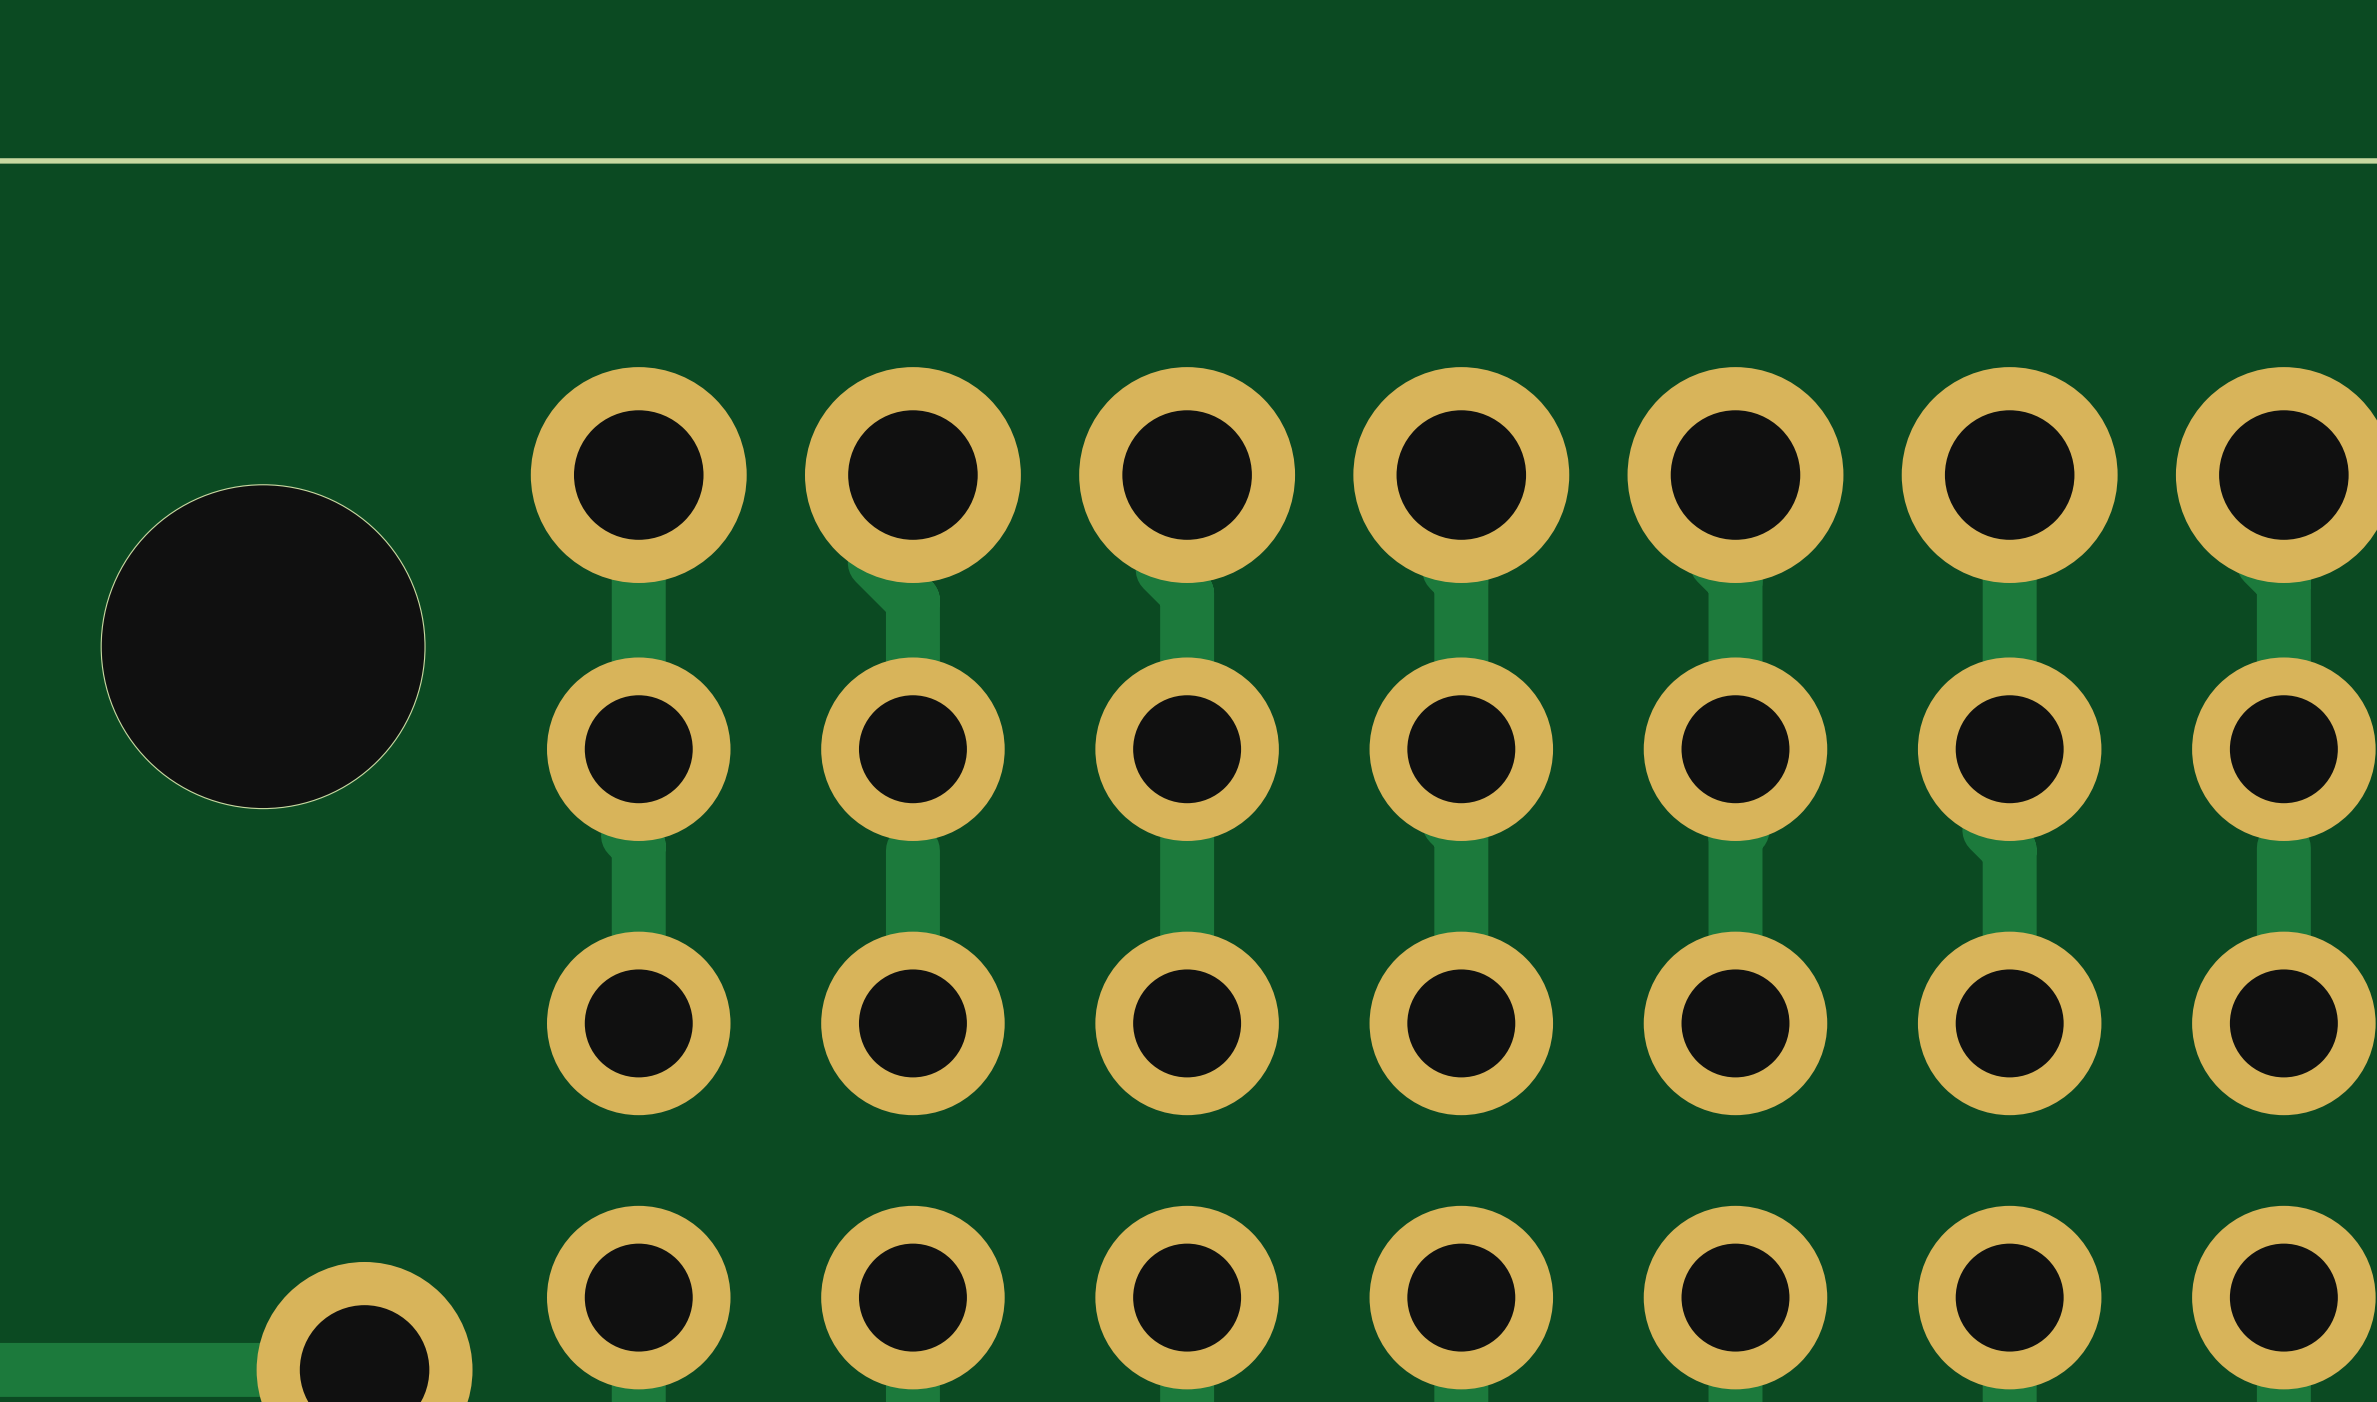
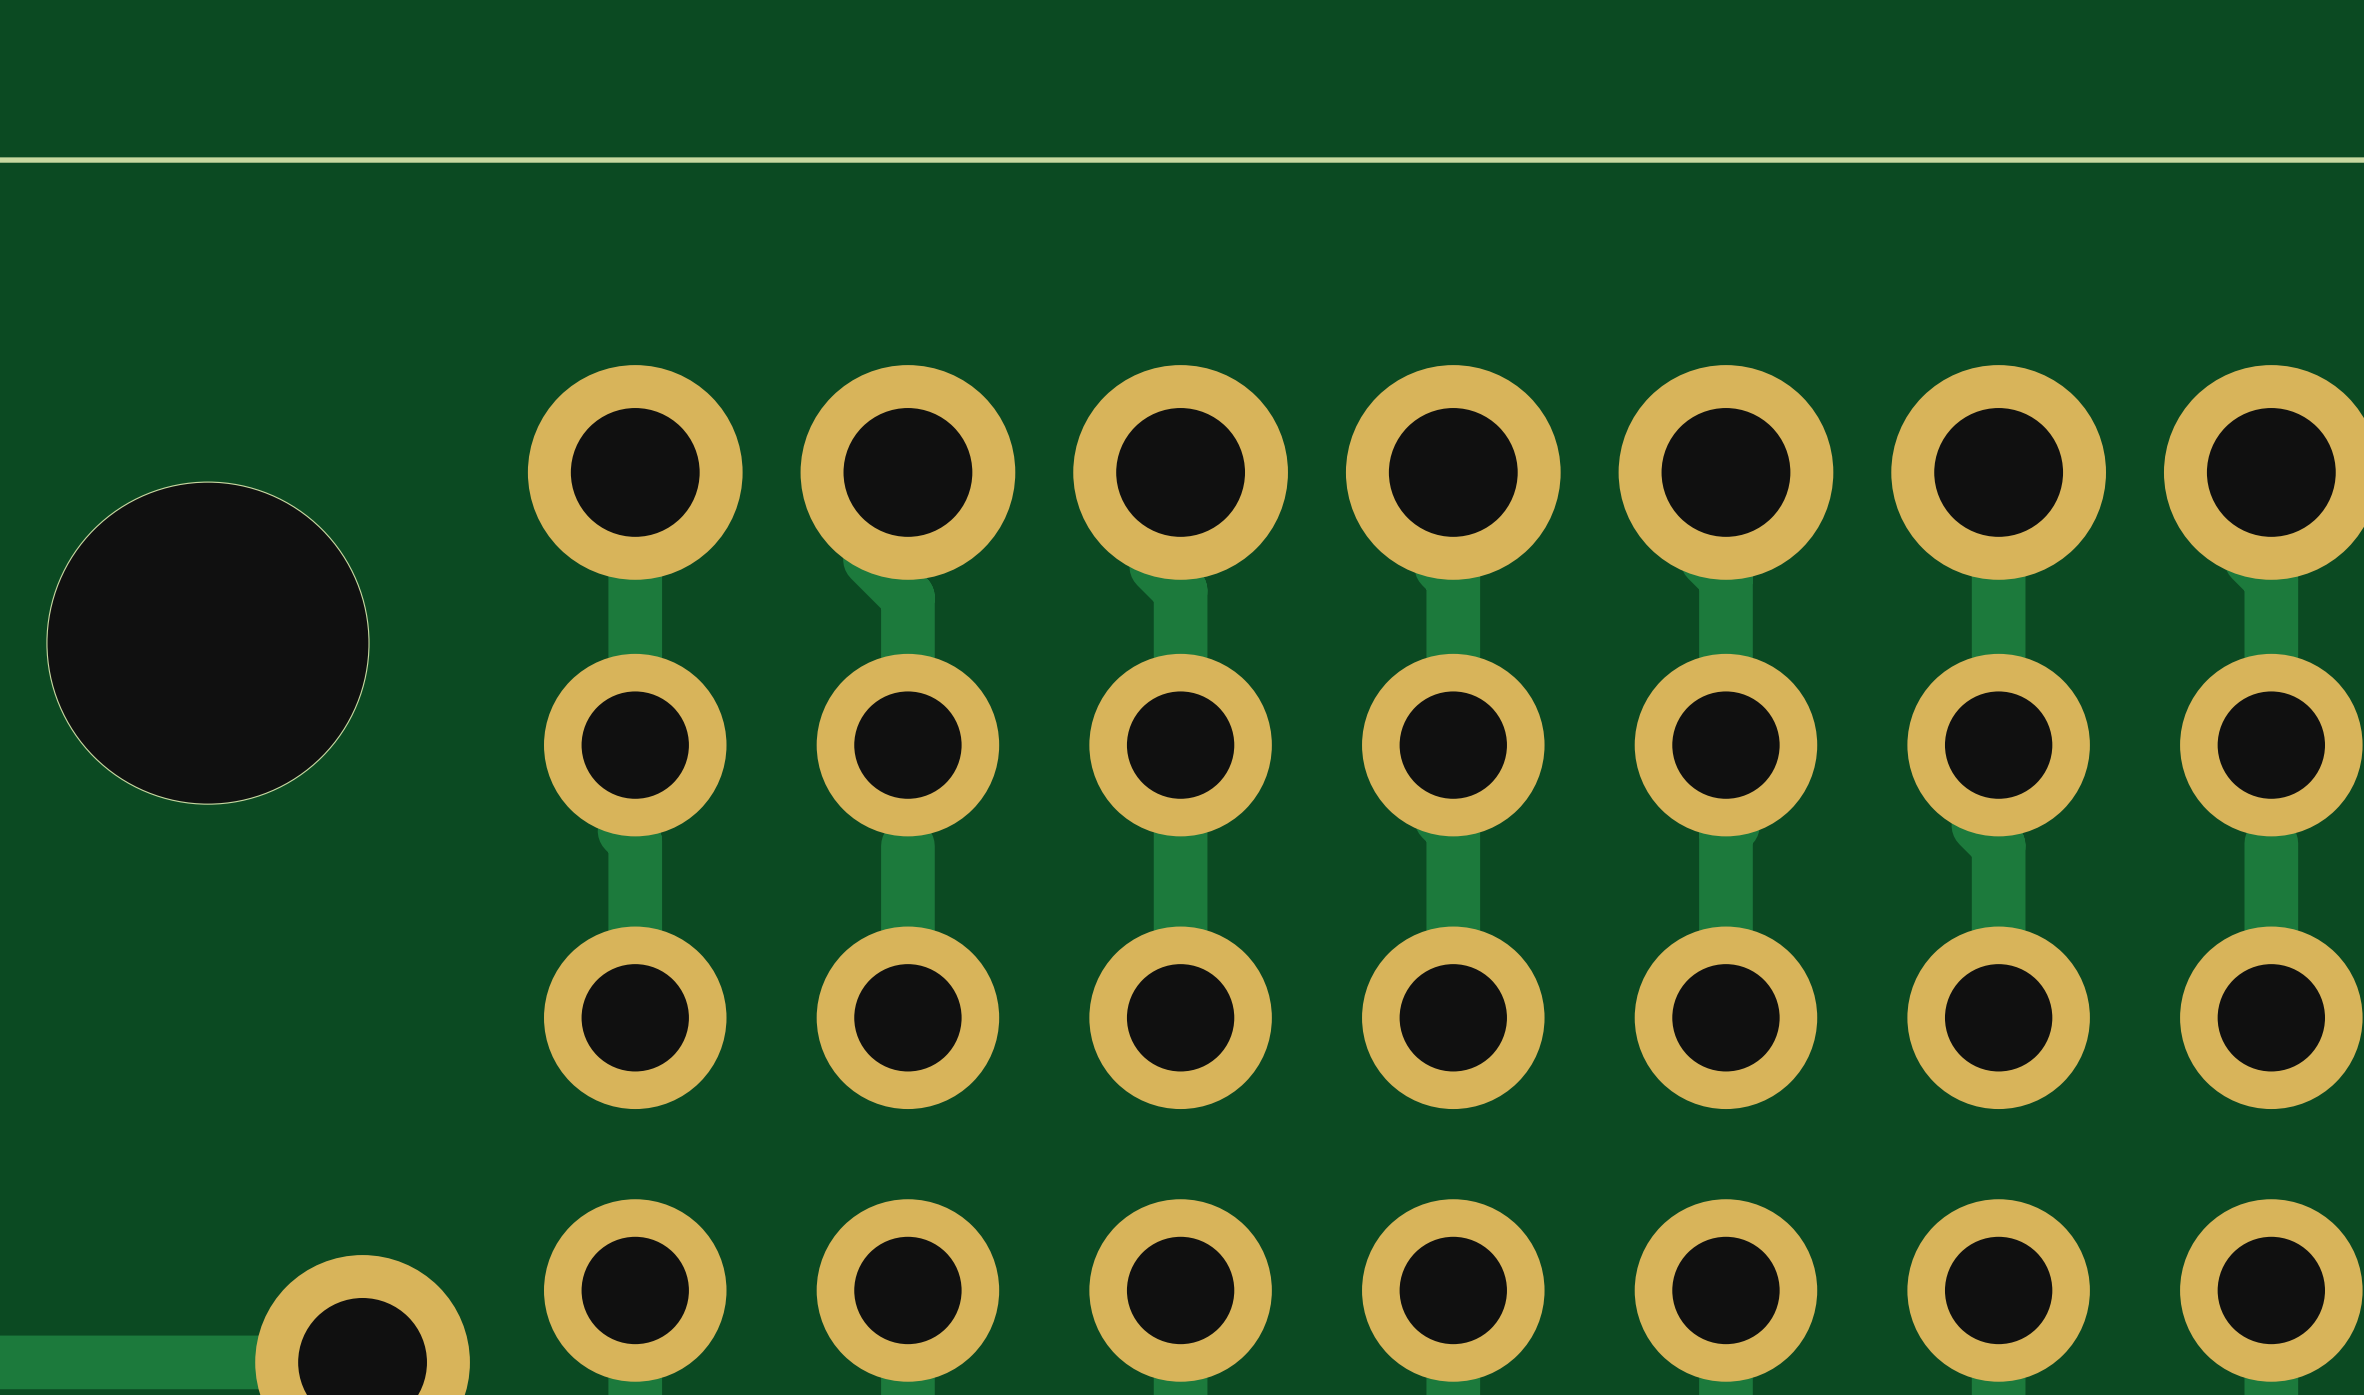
part position: (263, 646) -> (207, 643)

